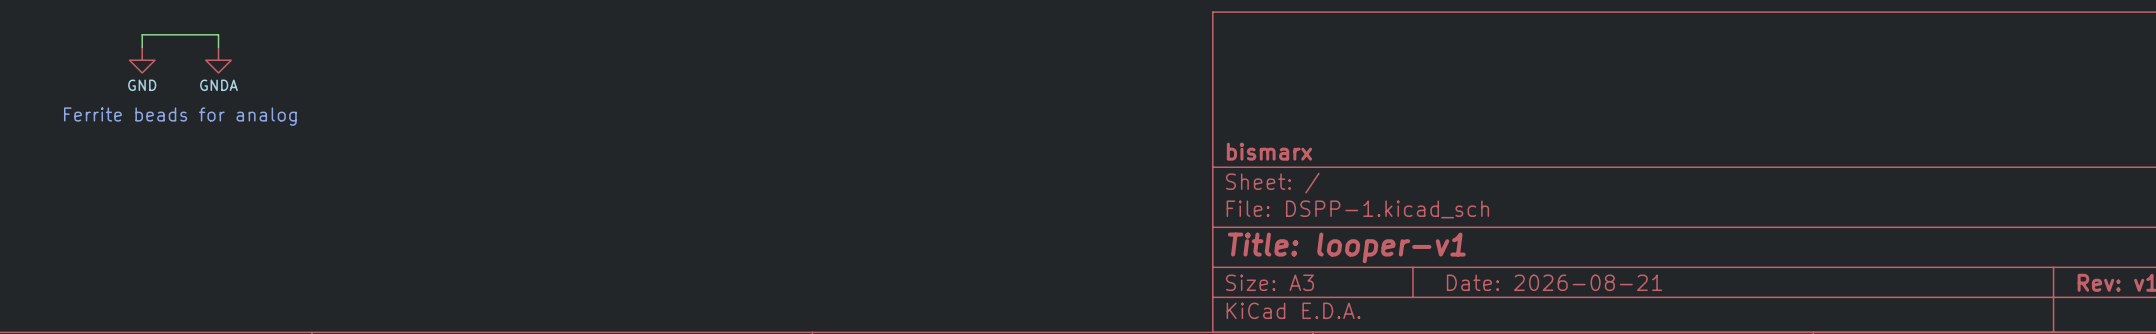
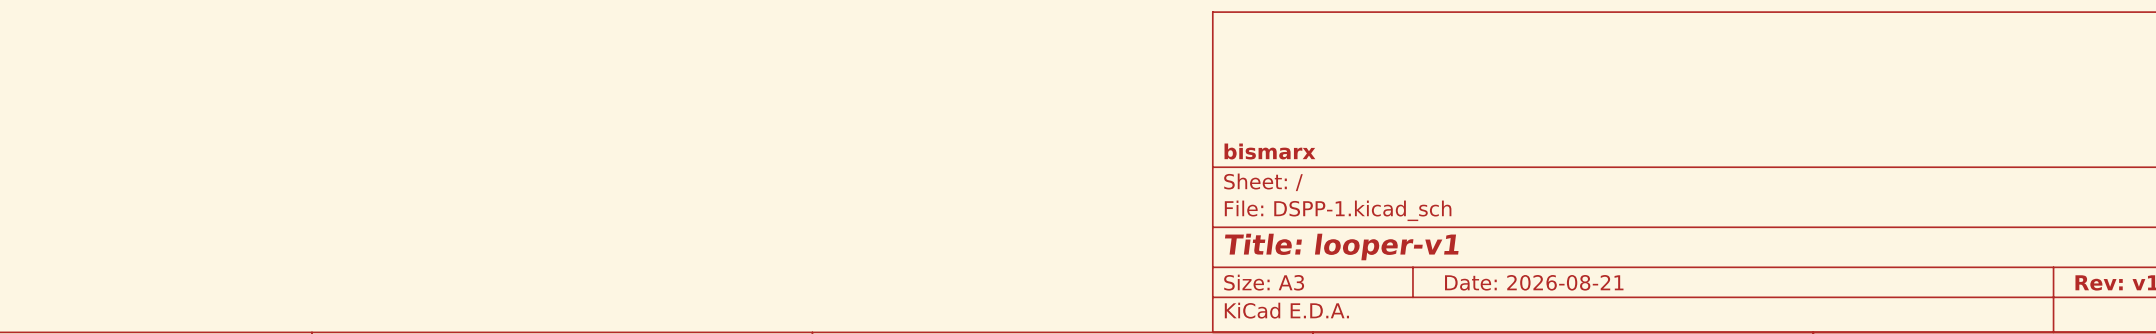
wire: (142, 47) (142, 34) (218, 34) (218, 47) -> none
power symbol: GND (142, 60) -> none
power symbol: GNDA (218, 60) -> none
text: Ferrite beads for analog (180, 116) -> none

